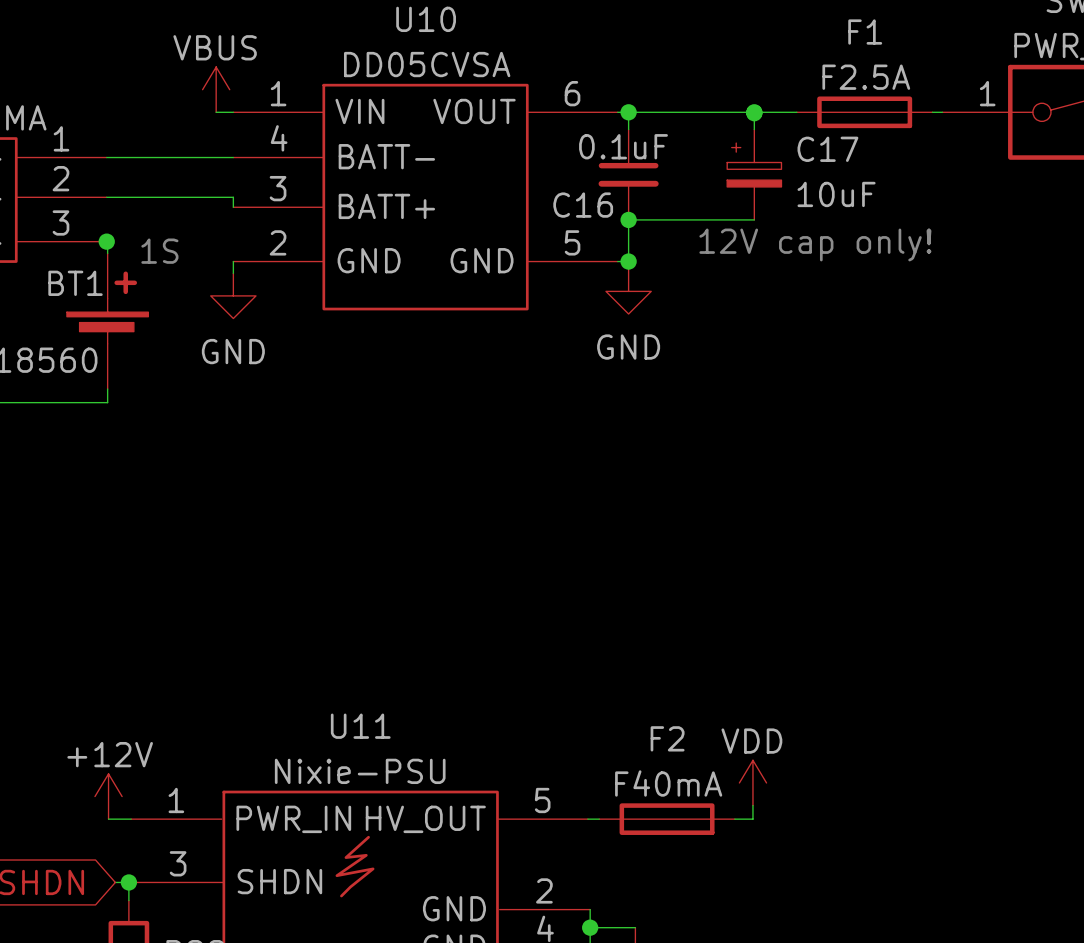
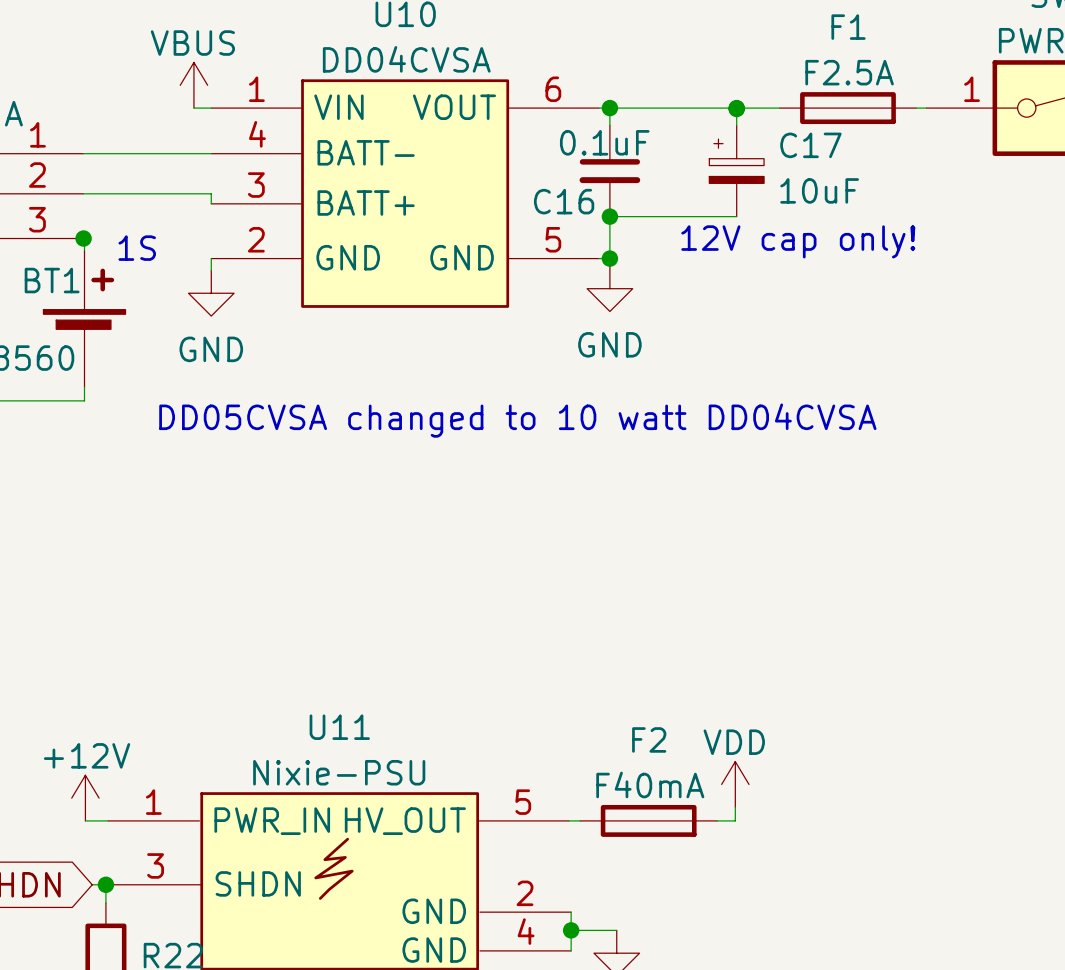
U10 value: DD05CVSA (427, 64) -> DD04CVSA (406, 59)
text: none -> DD05CVSA changed to 10 watt DD04CVSA (517, 420)

